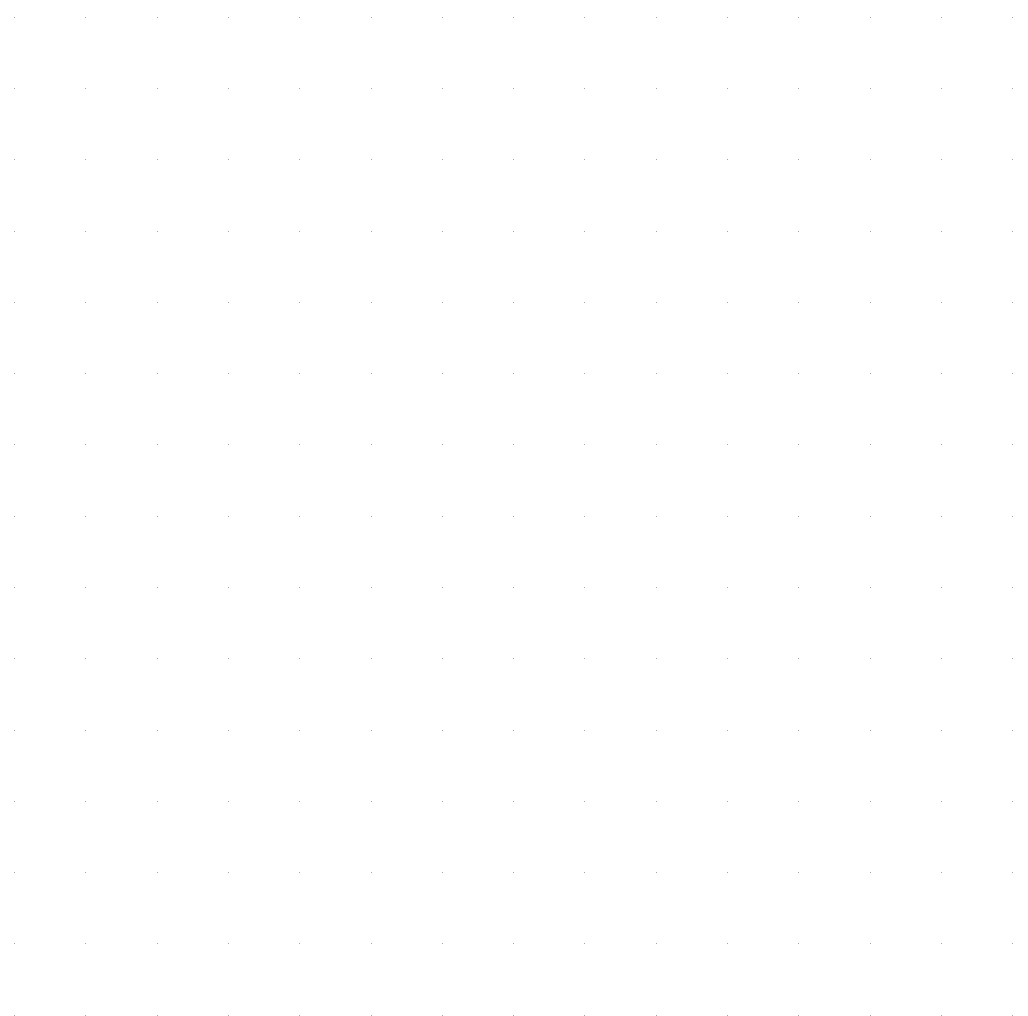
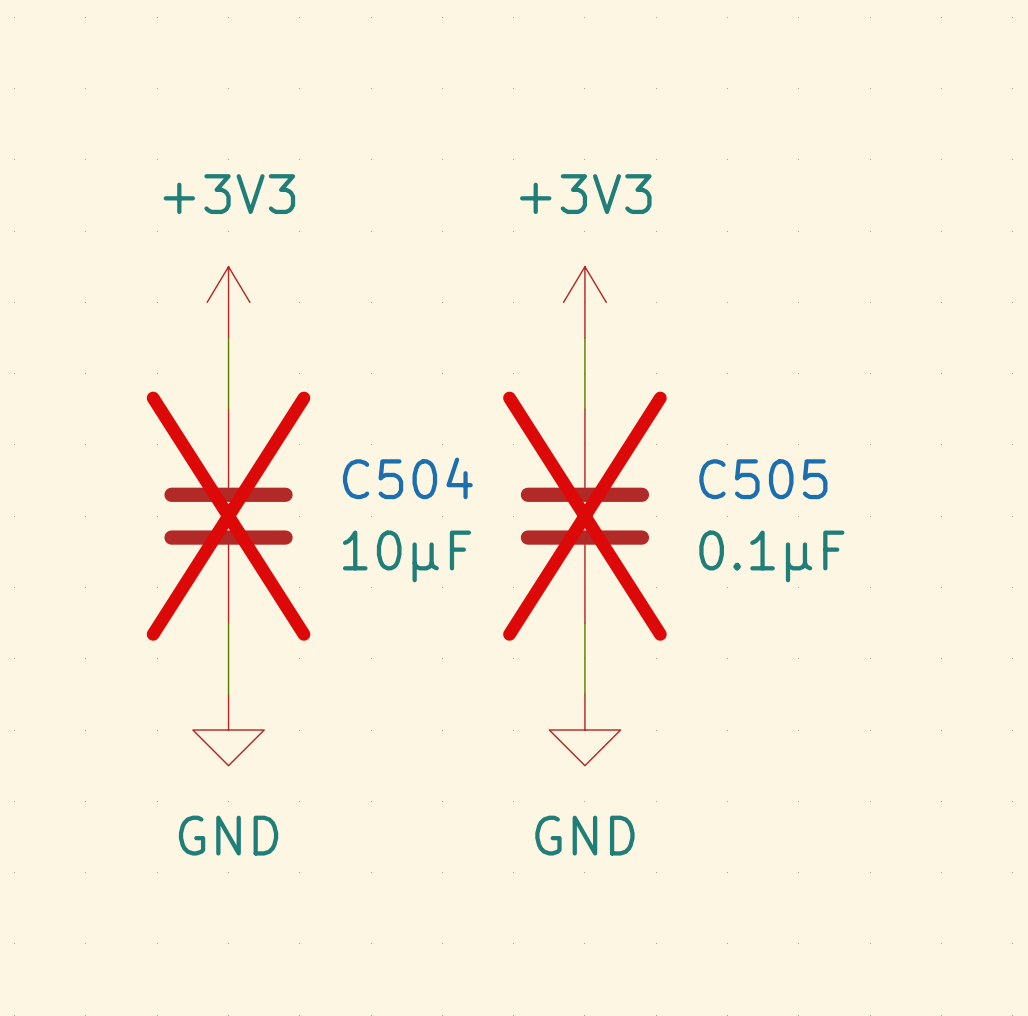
power symbol: none -> +3V3 (228, 302)
power symbol: none -> +3V3 (584, 302)
wire: none -> (228, 337) (228, 409)
wire: none -> (584, 337) (584, 409)
C504: none -> 10µF (228, 516)
C505: none -> 0.1µF (584, 516)
wire: none -> (228, 623) (228, 694)
wire: none -> (584, 623) (584, 694)
power symbol: none -> GND (228, 730)
power symbol: none -> GND (584, 730)

